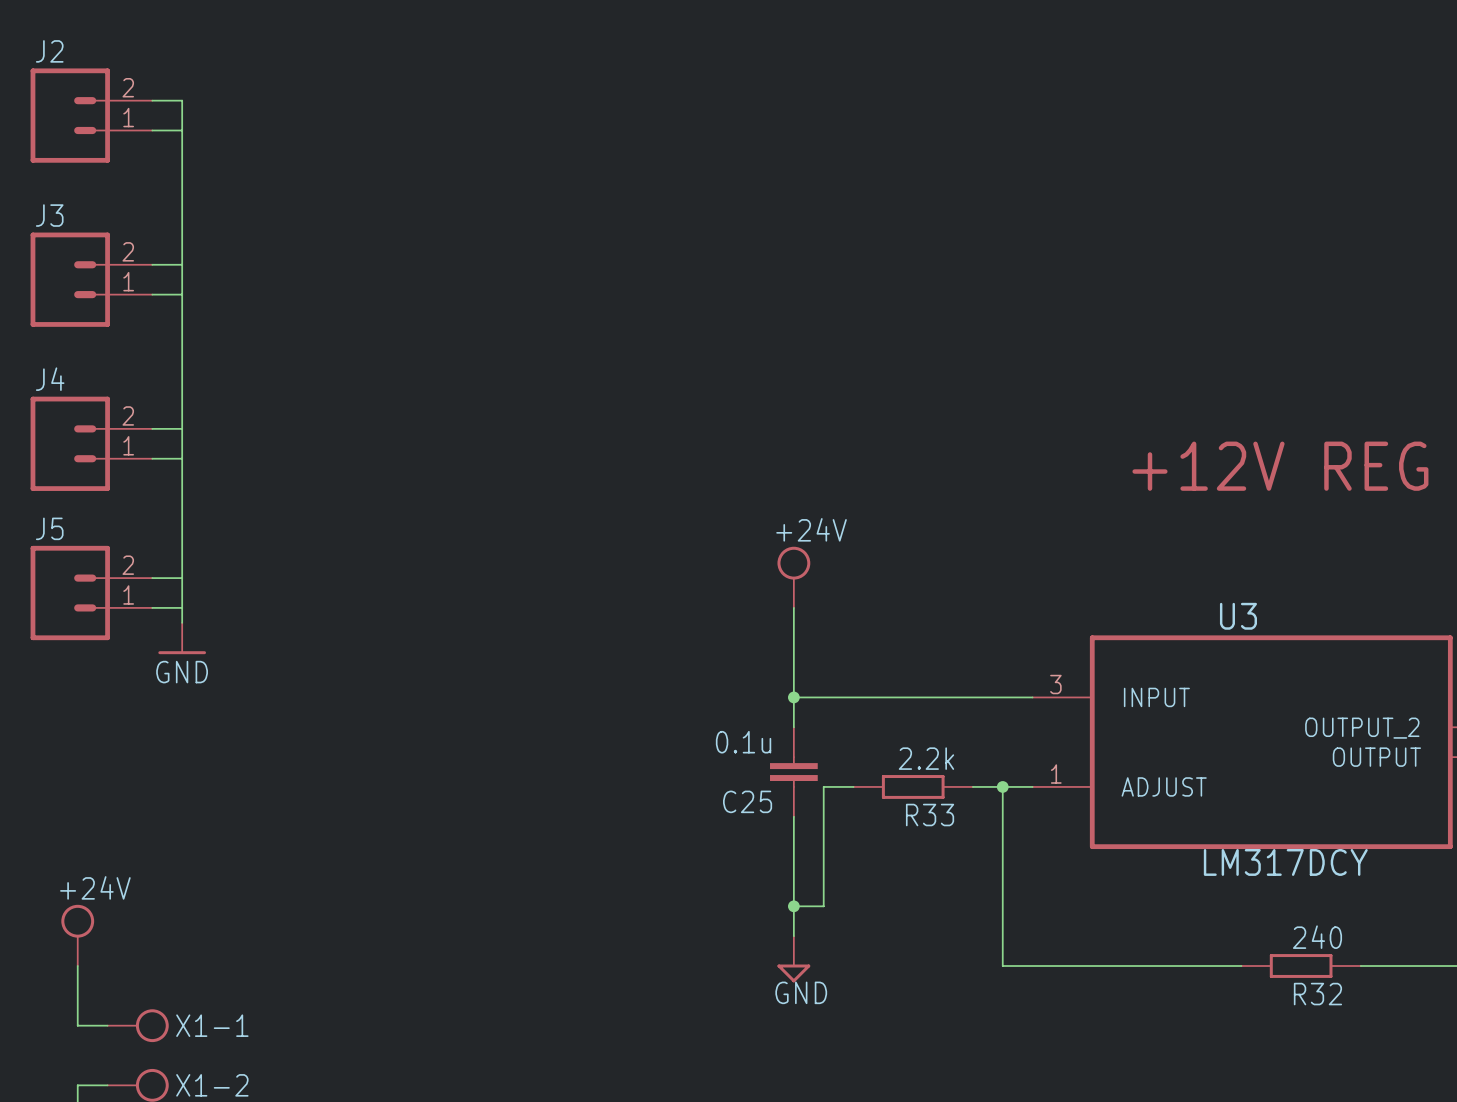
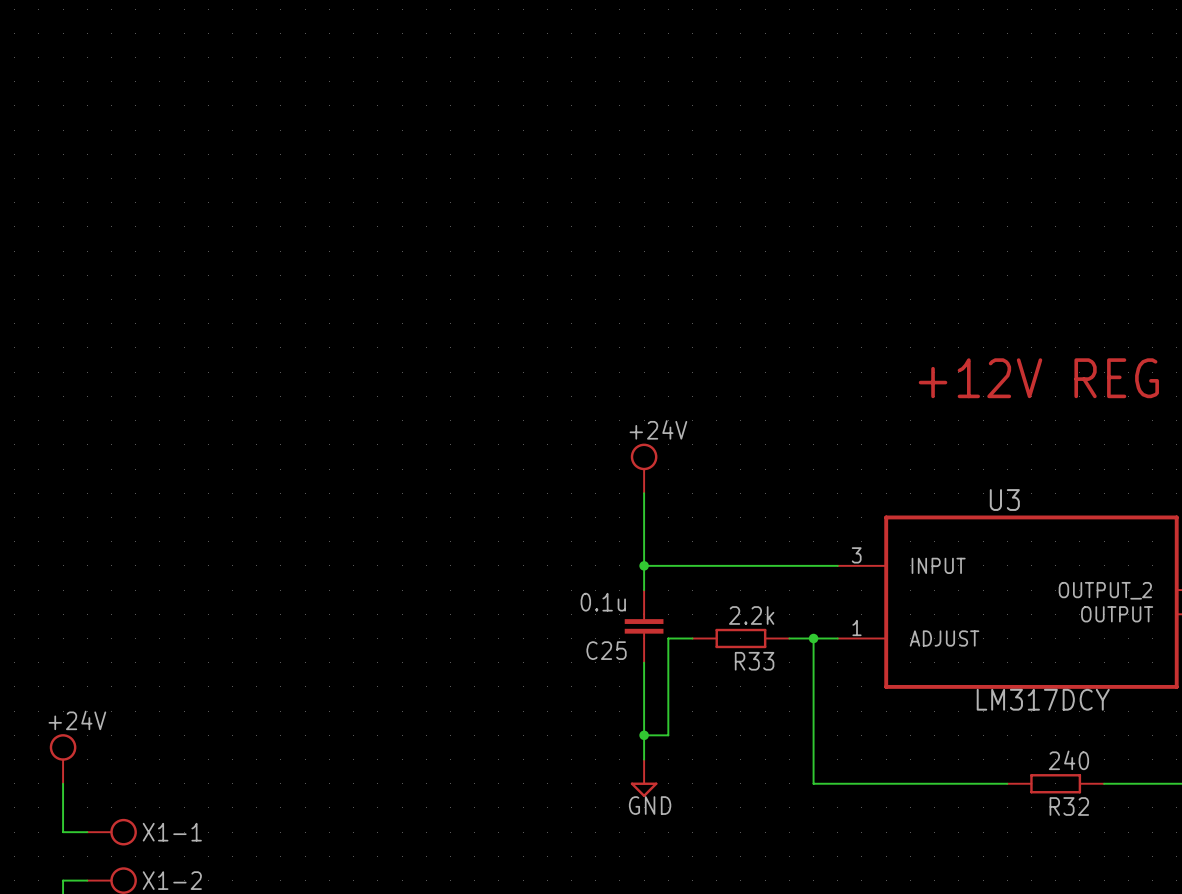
wire: (152, 100) (182, 100) (182, 622) -> none
J2: (91, 115) -> none
wire: (152, 130) (182, 130) -> none
wire: (152, 264) (182, 264) -> none
J3: (91, 279) -> none
wire: (152, 294) (182, 294) -> none
wire: (152, 428) (182, 428) -> none
J4: (91, 443) -> none
wire: (152, 458) (182, 458) -> none
wire: (152, 578) (182, 578) -> none
J5: (91, 593) -> none
wire: (152, 607) (182, 607) -> none
power symbol: GND (182, 638) -> none

